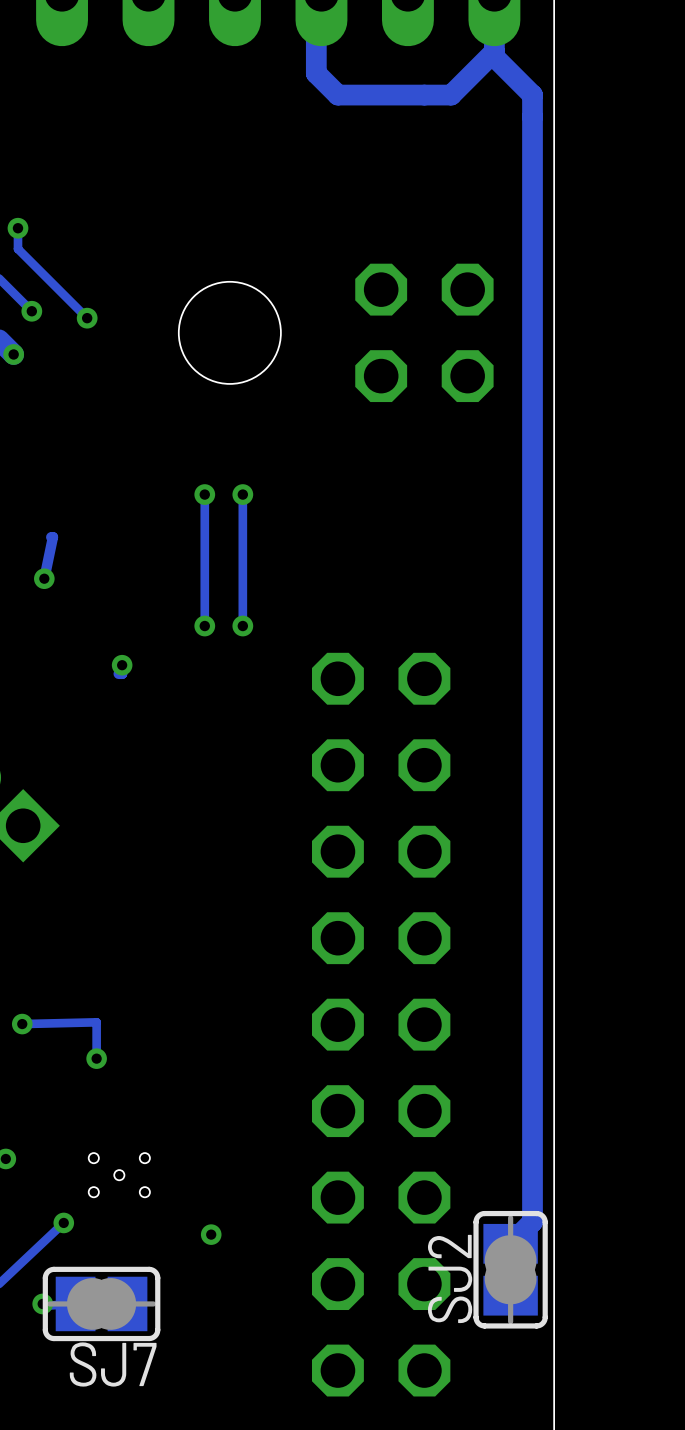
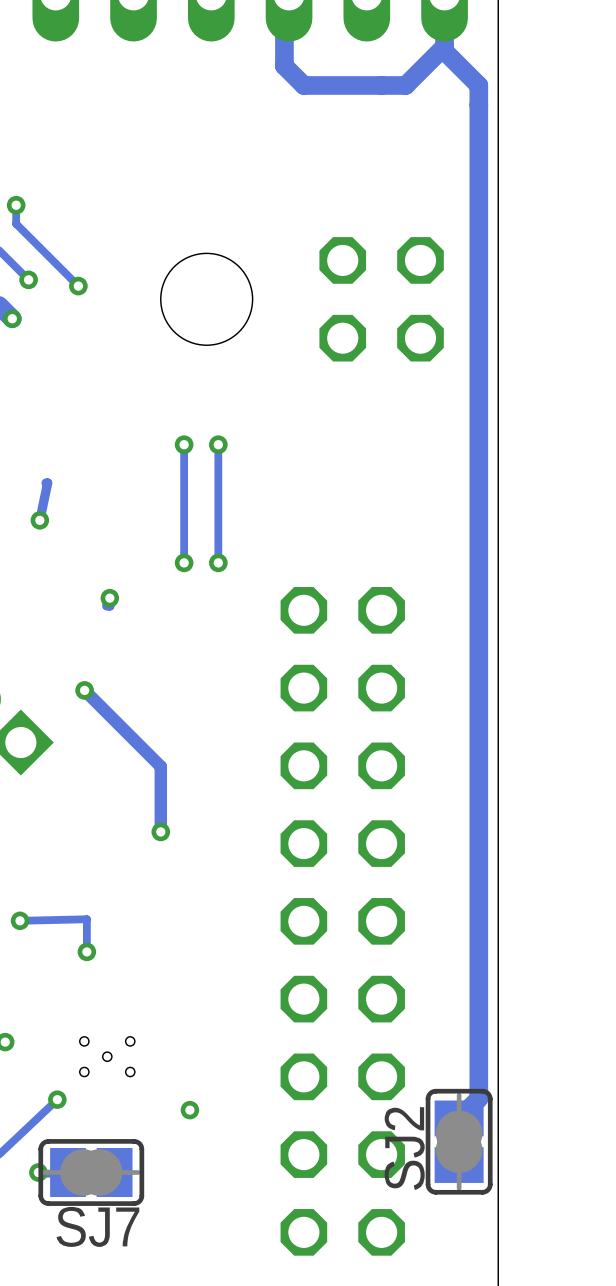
track: none -> (84, 690) (160, 766) (160, 831)
via: none -> (84, 690)
via: none -> (160, 831)

